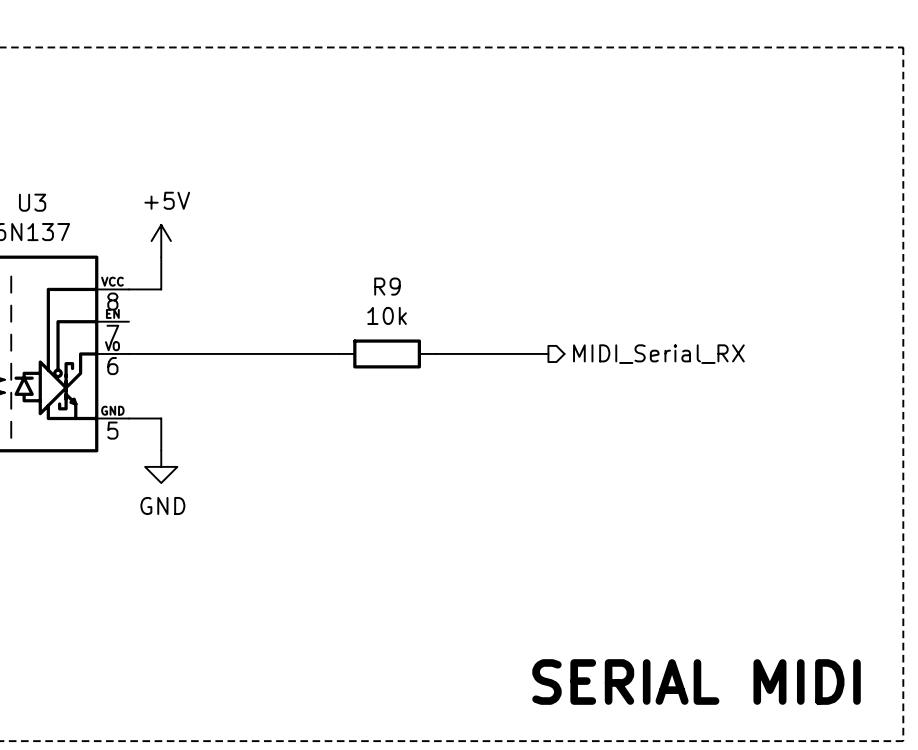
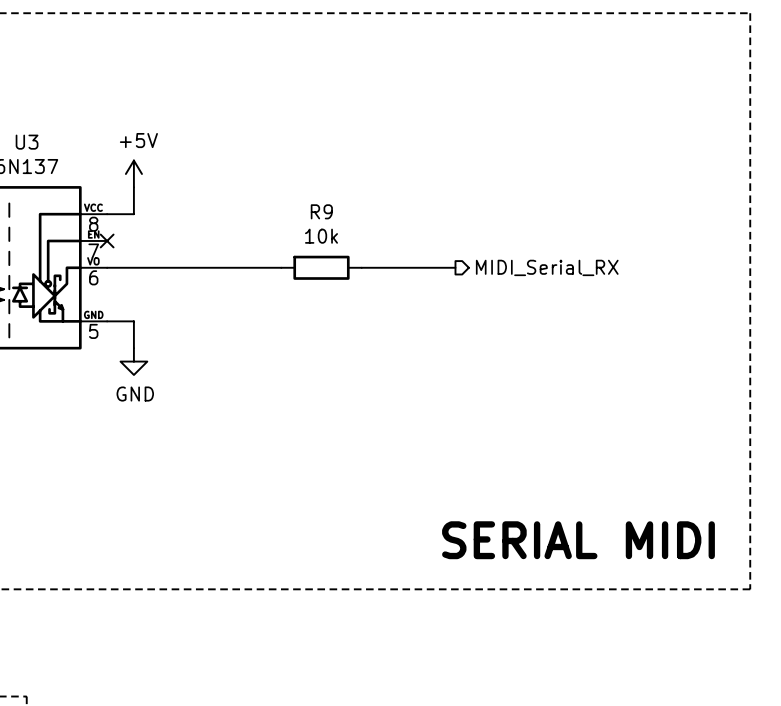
no-connect mark: none -> (107, 240)

